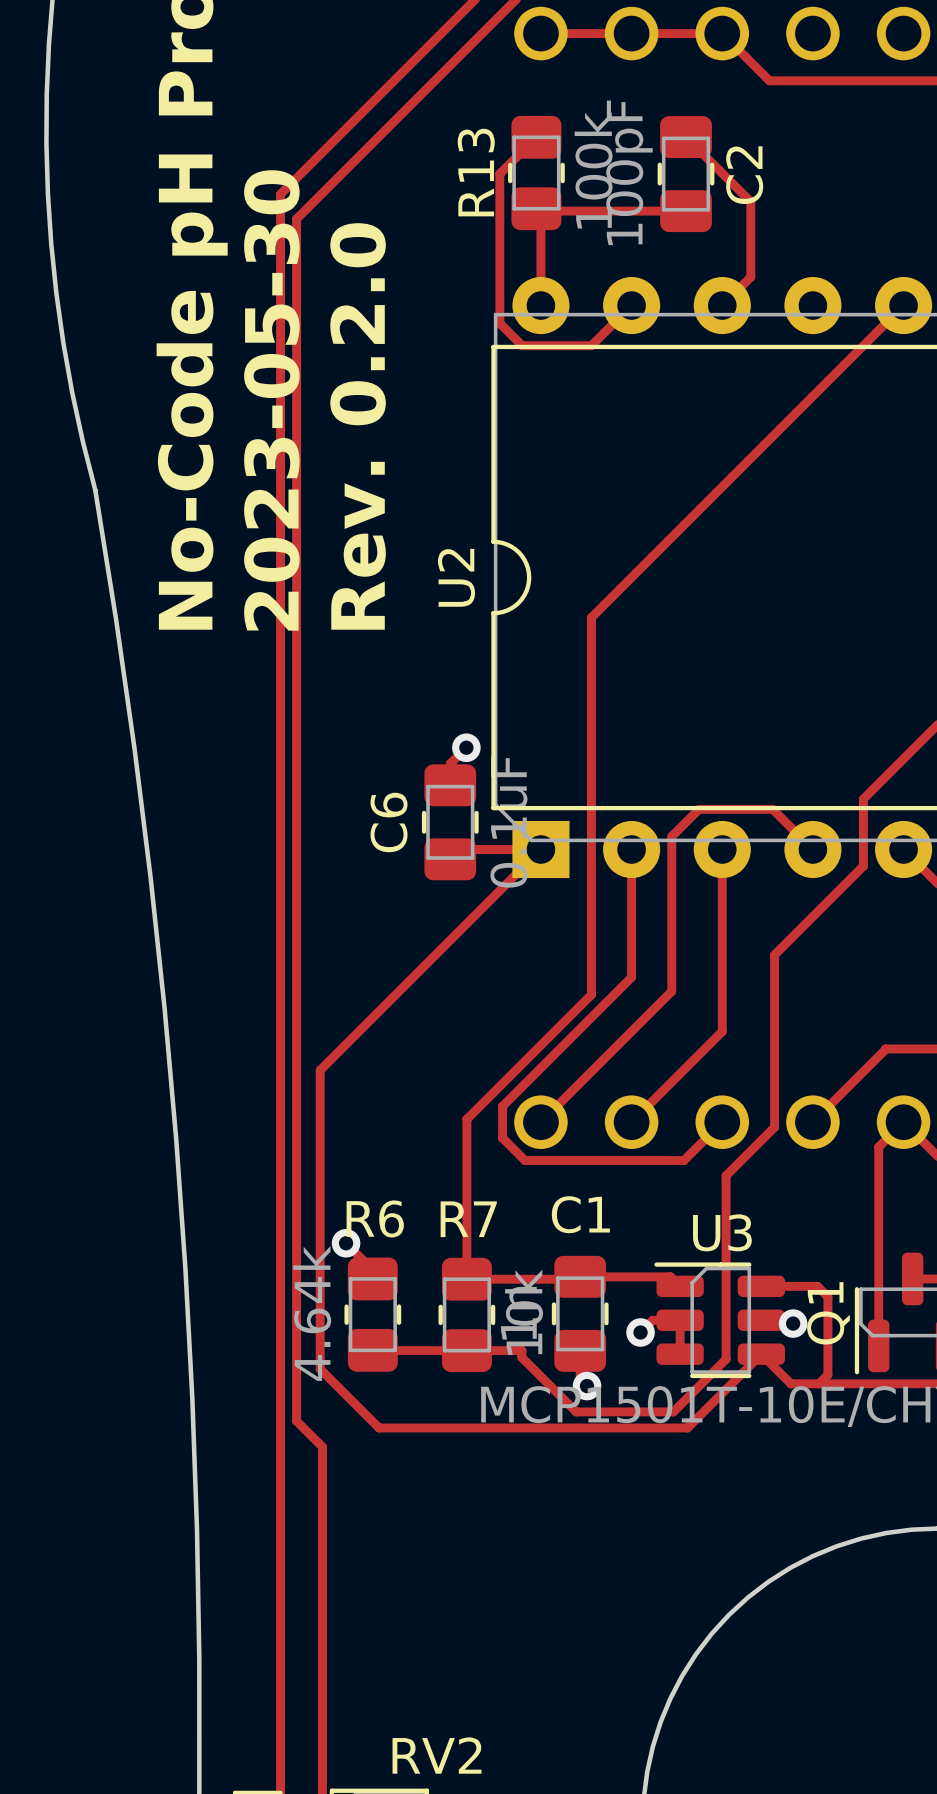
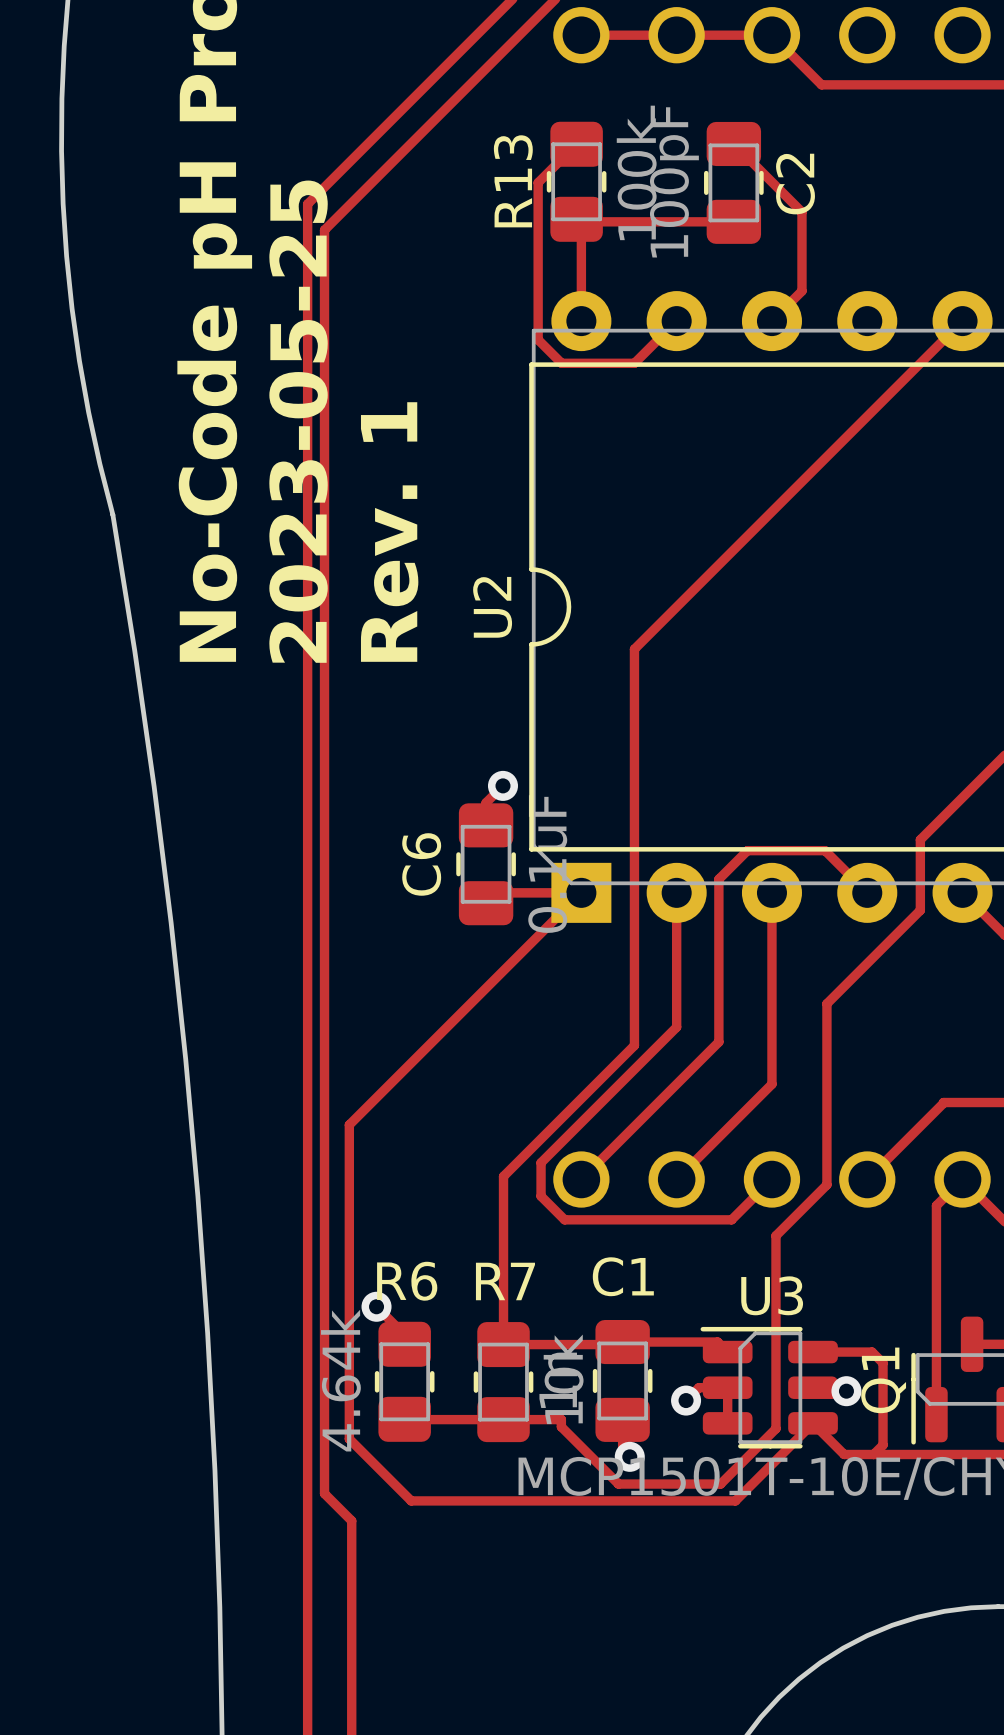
text: 2023-05-30 (271, 400) -> 2023-05-25 (298, 421)
text: Rev. 0.2.0 (358, 426) -> Rev. 1 (389, 532)

